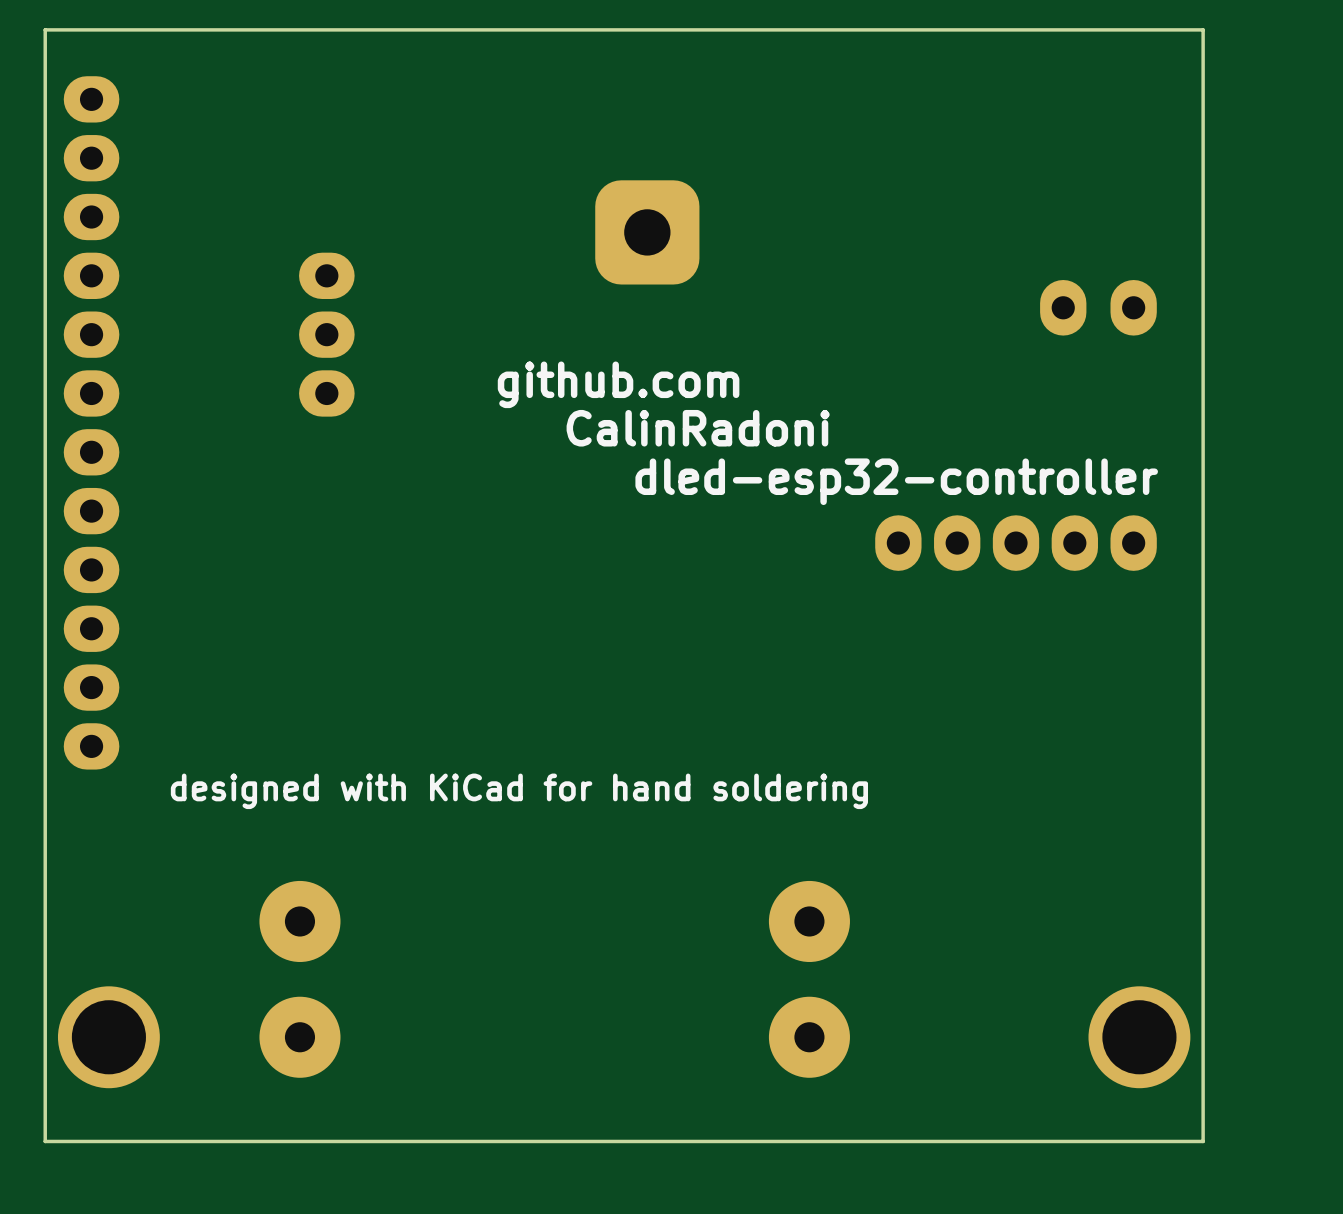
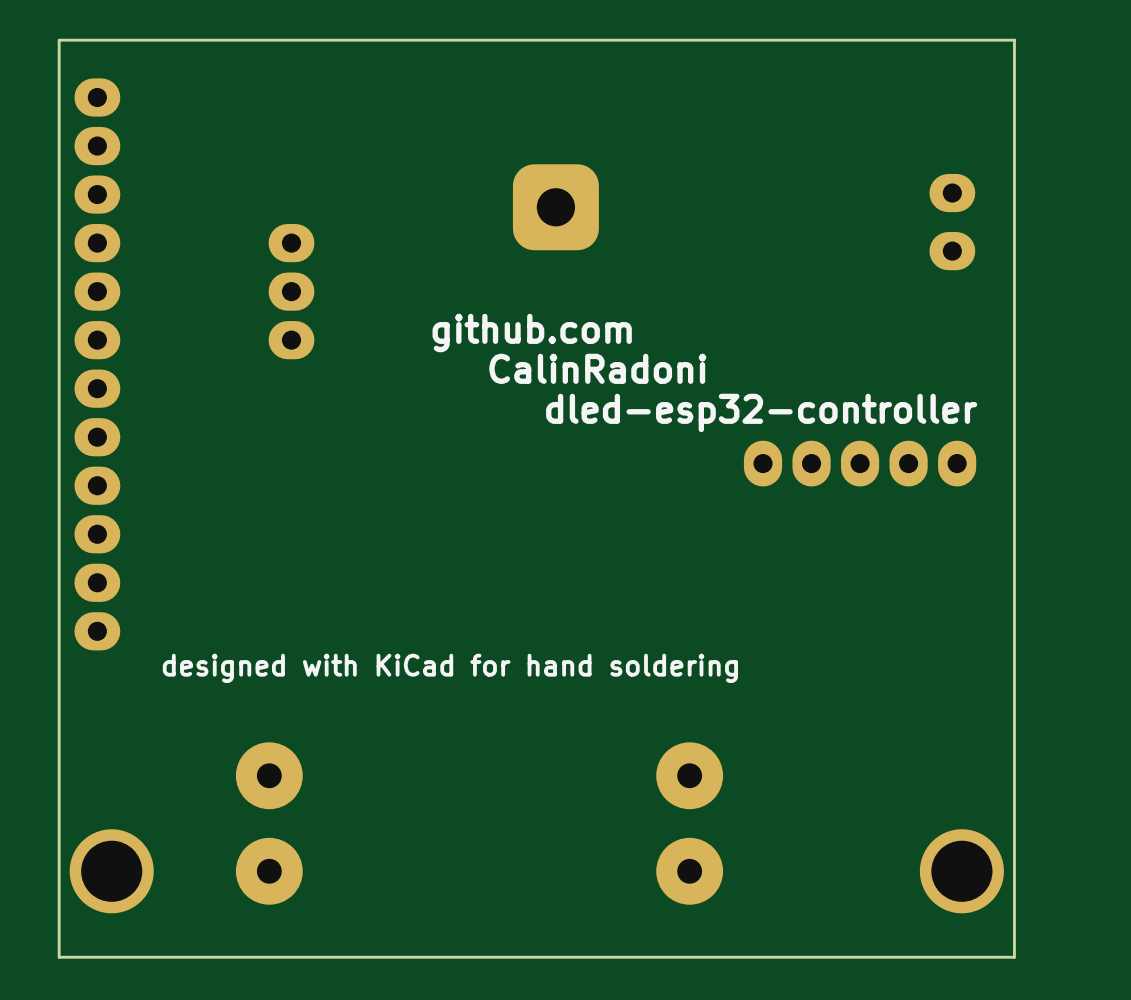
part rotation: 0° (1098, 307) -> 90° clockwise (952, 222)

